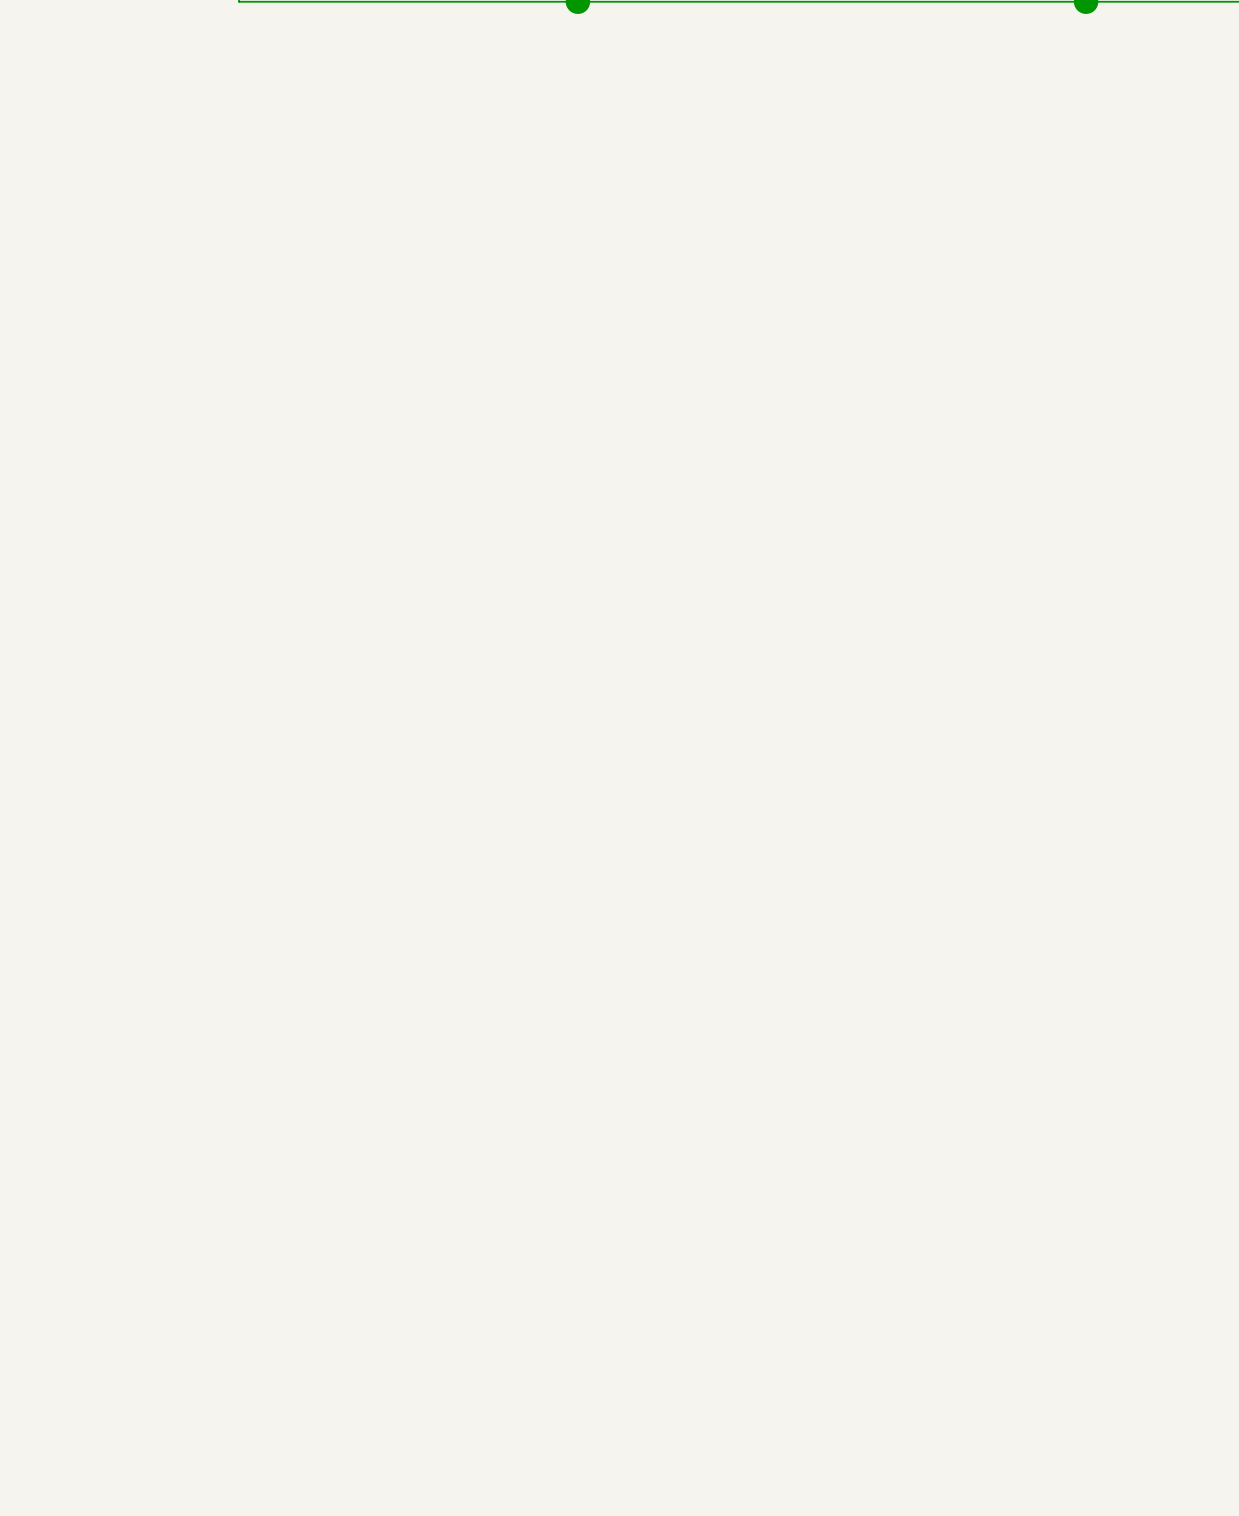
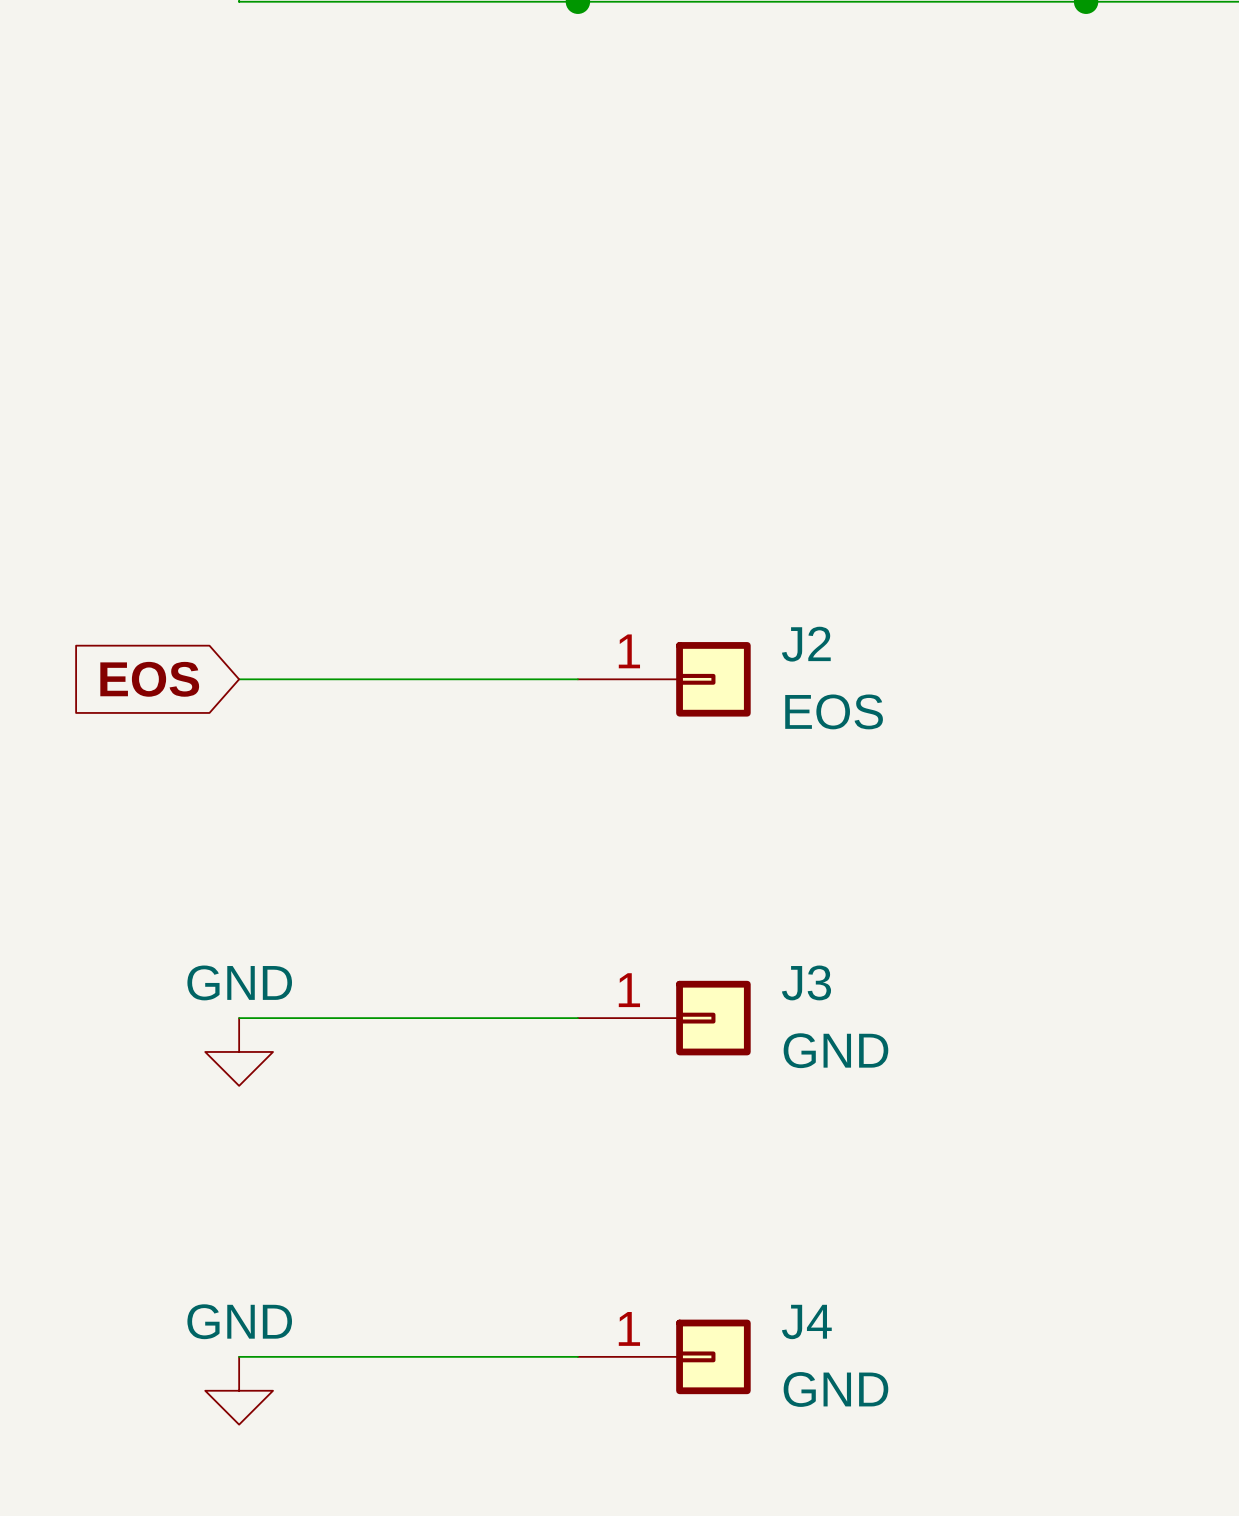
global label: none -> EOS (149, 679)
wire: none -> (239, 679) (577, 679)
J2: none -> EOS (664, 679)
wire: none -> (239, 1018) (577, 1018)
J3: none -> GND (664, 1018)
power symbol: none -> GND (239, 1051)
wire: none -> (239, 1356) (577, 1356)
J4: none -> GND (664, 1356)
power symbol: none -> GND (239, 1390)

